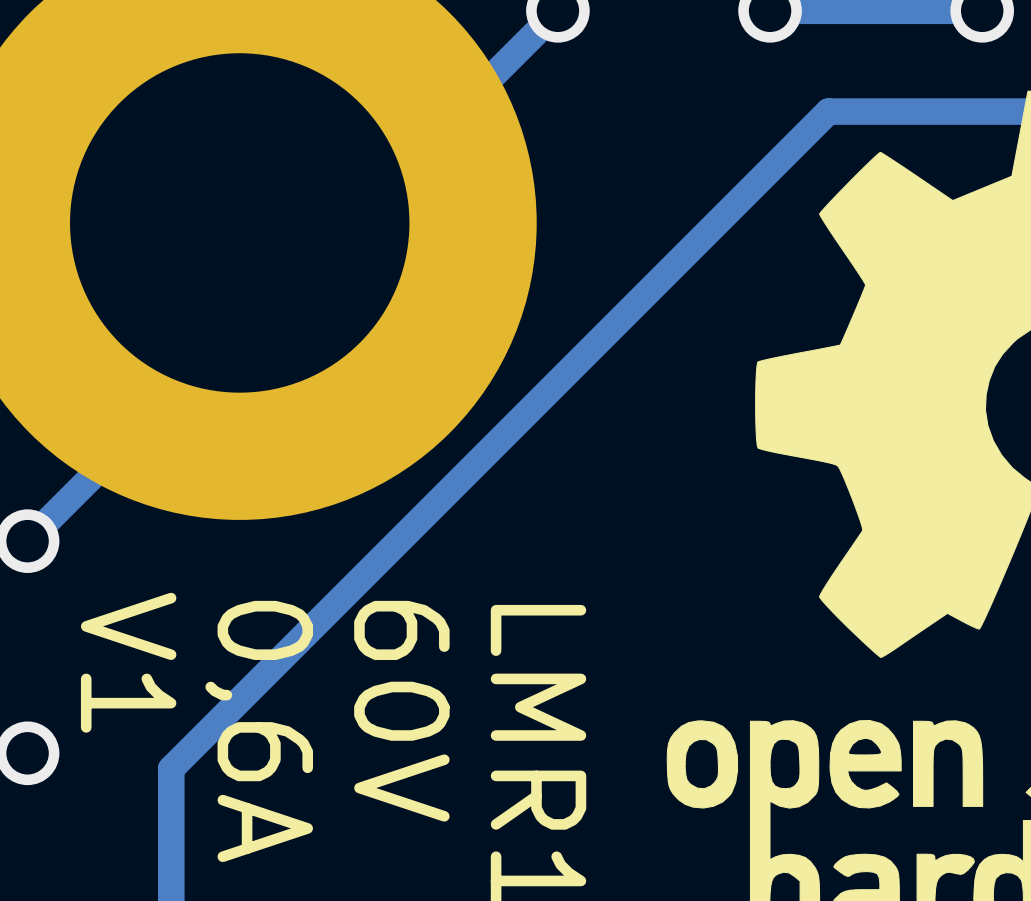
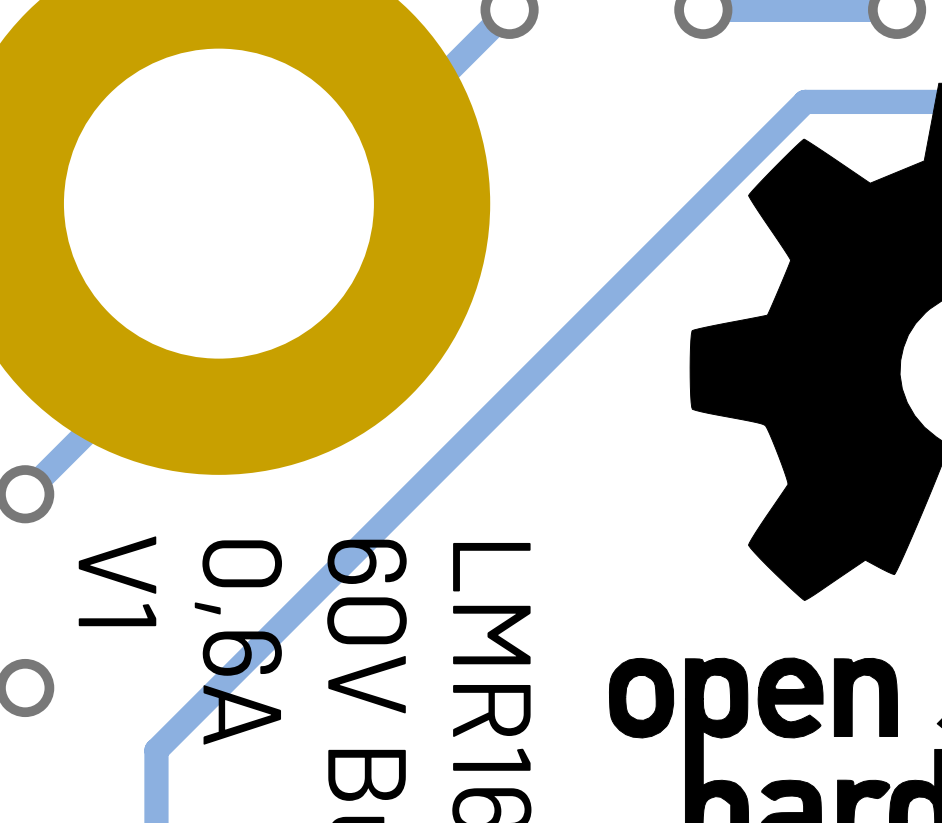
track: (881, 111) (828, 111) (171, 768) (171, 821) -> (805, 101) (156, 750)

